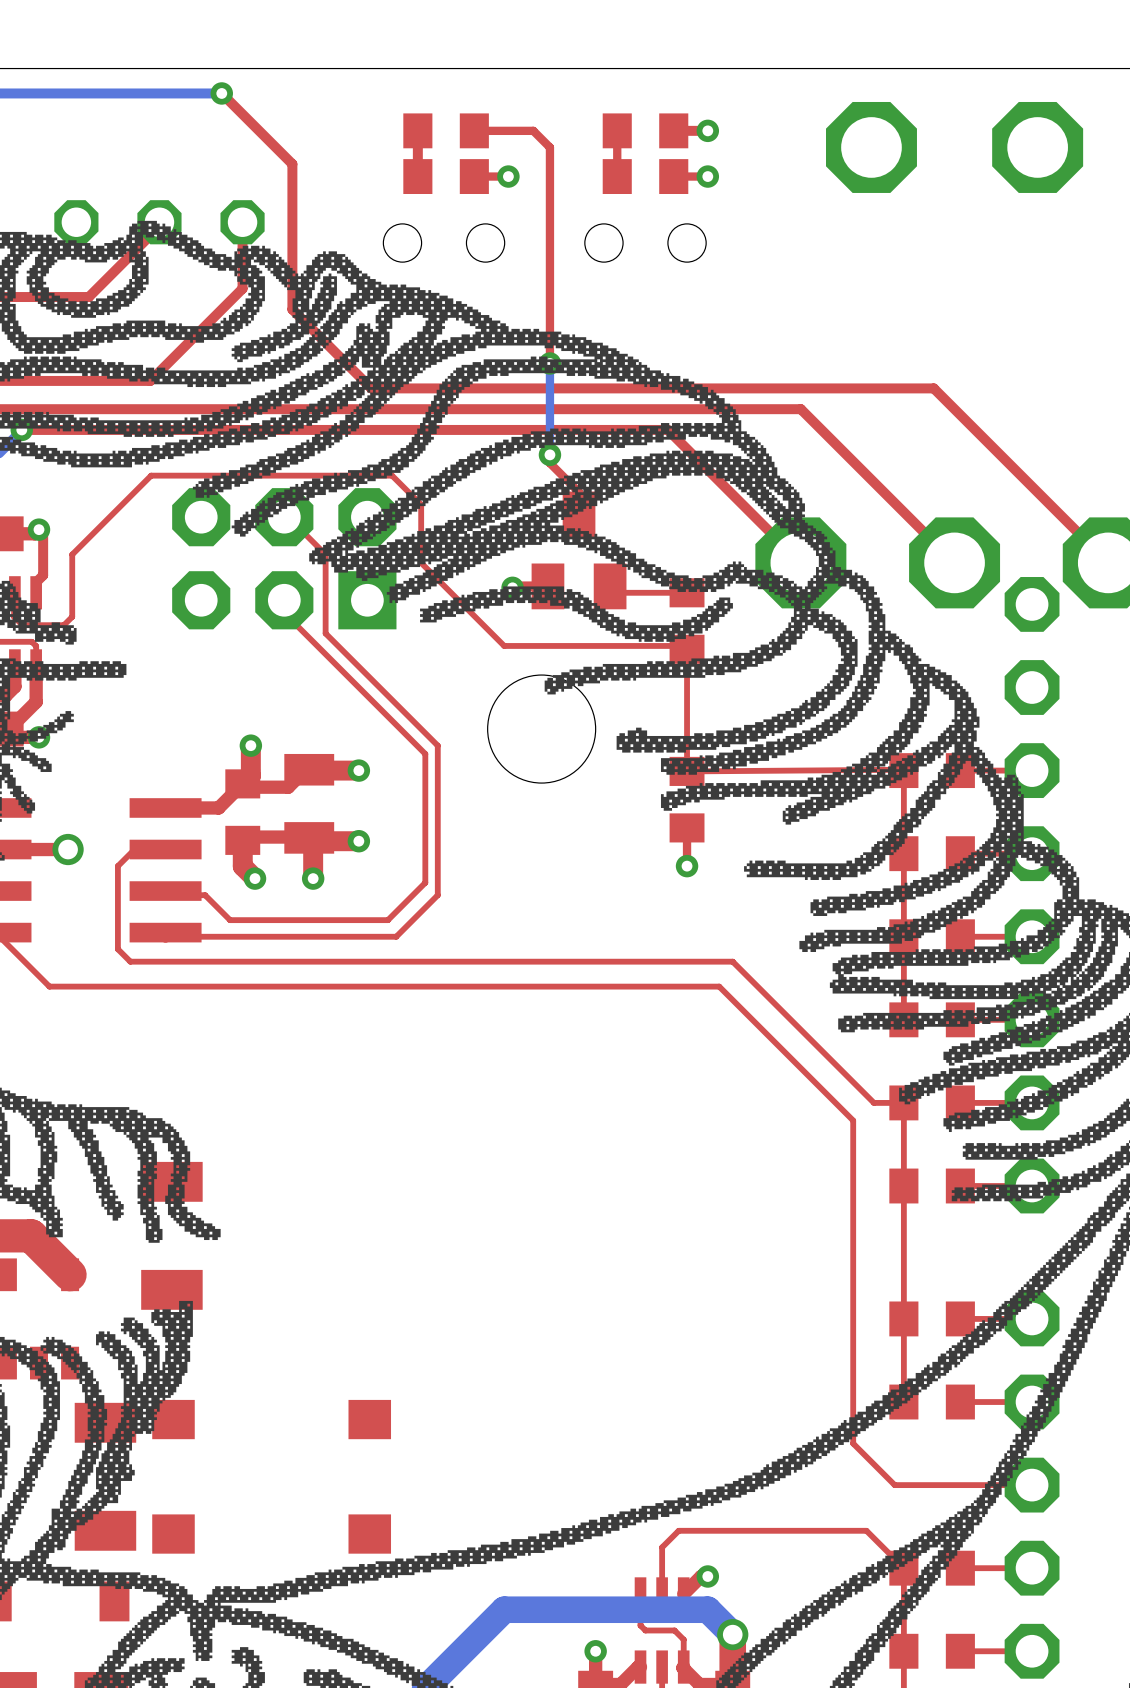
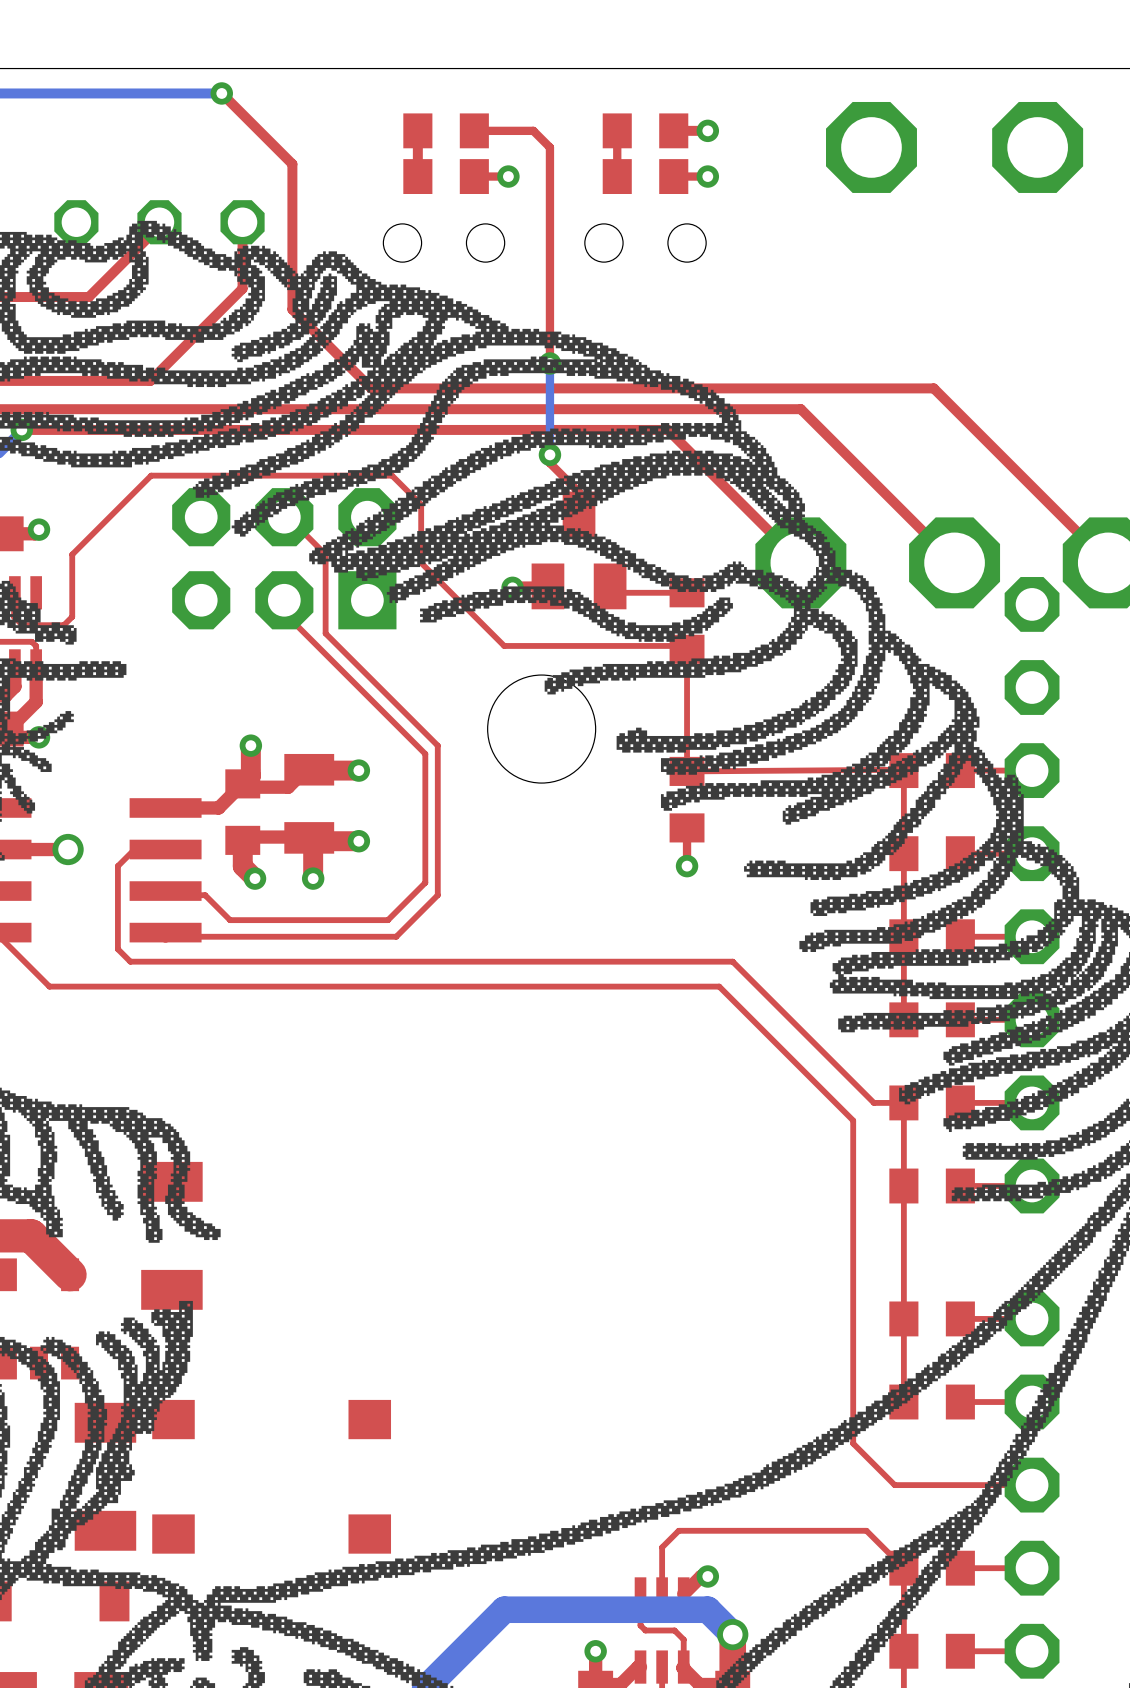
top track: (43, 533) (43, 575) (36, 582) (36, 592) -> none

